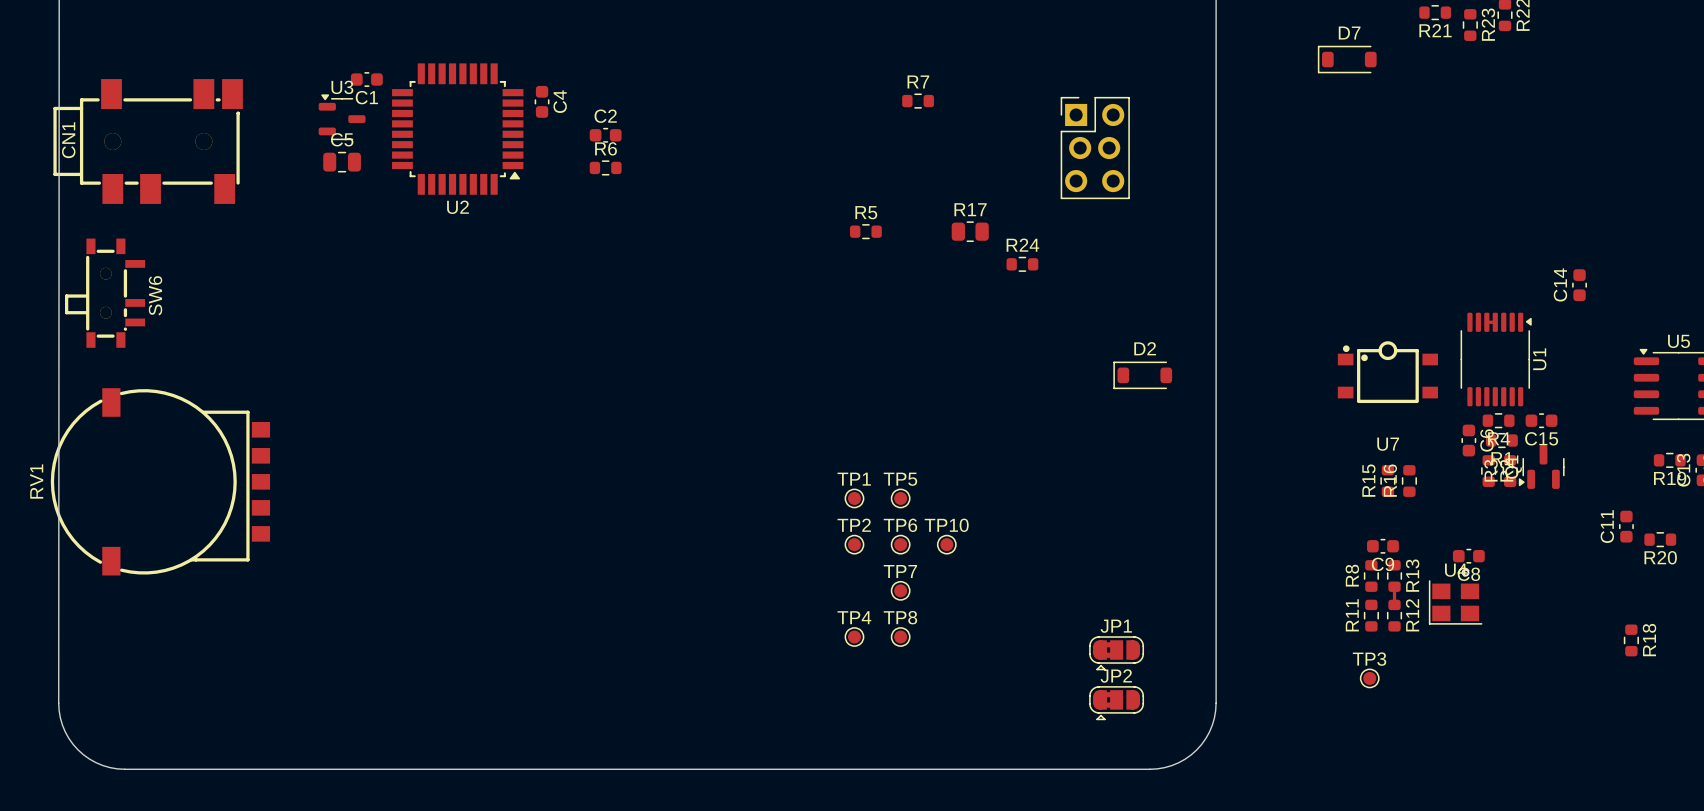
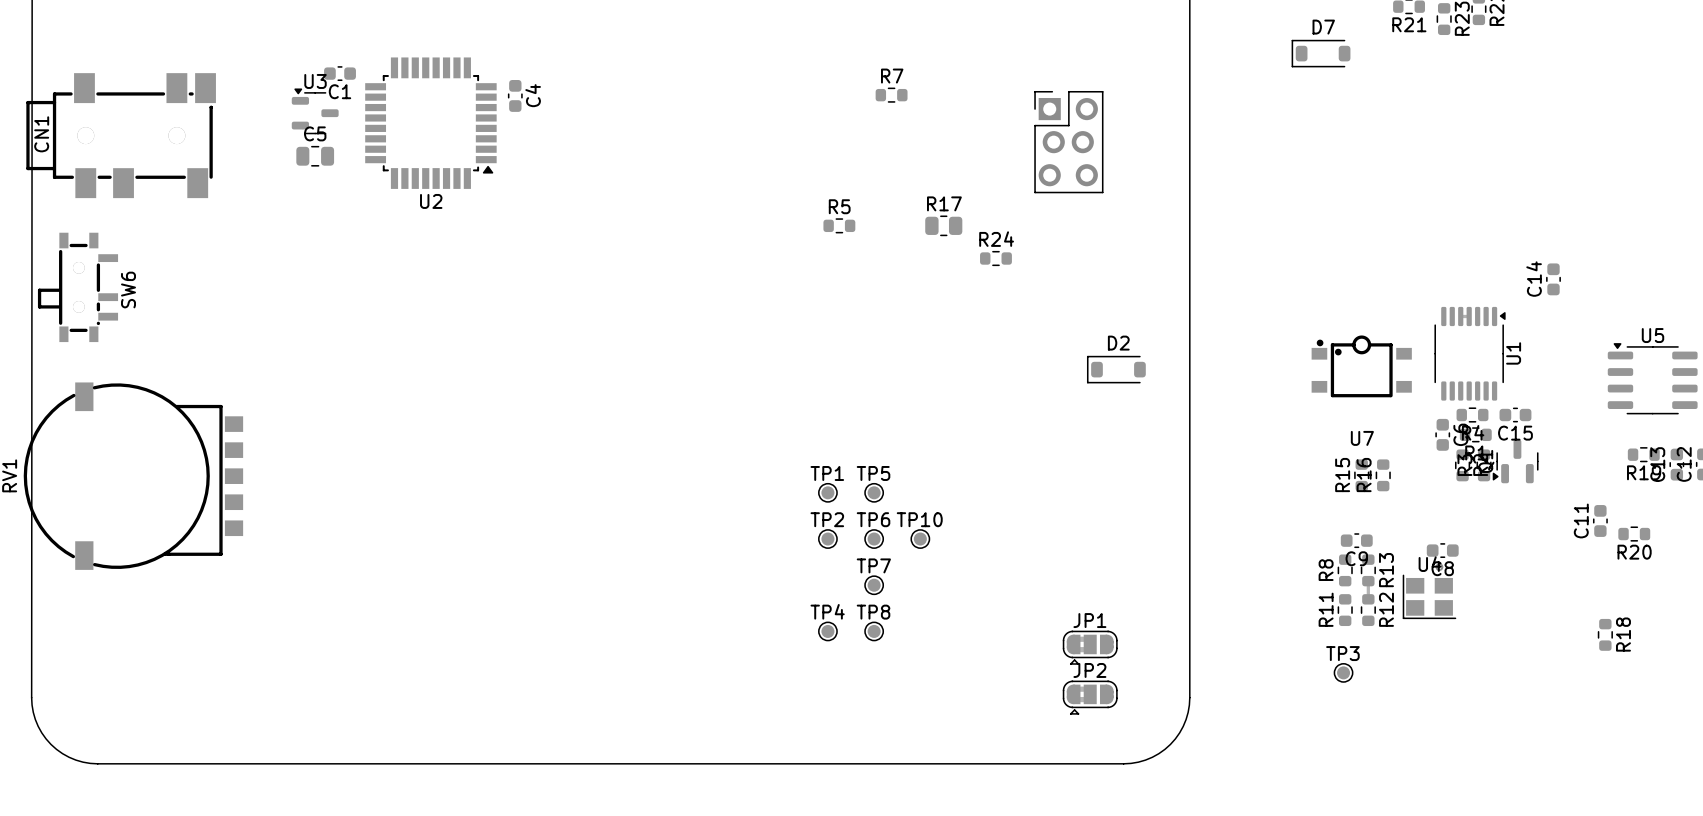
C2: (605, 135) -> none
R6: (605, 167) -> none

